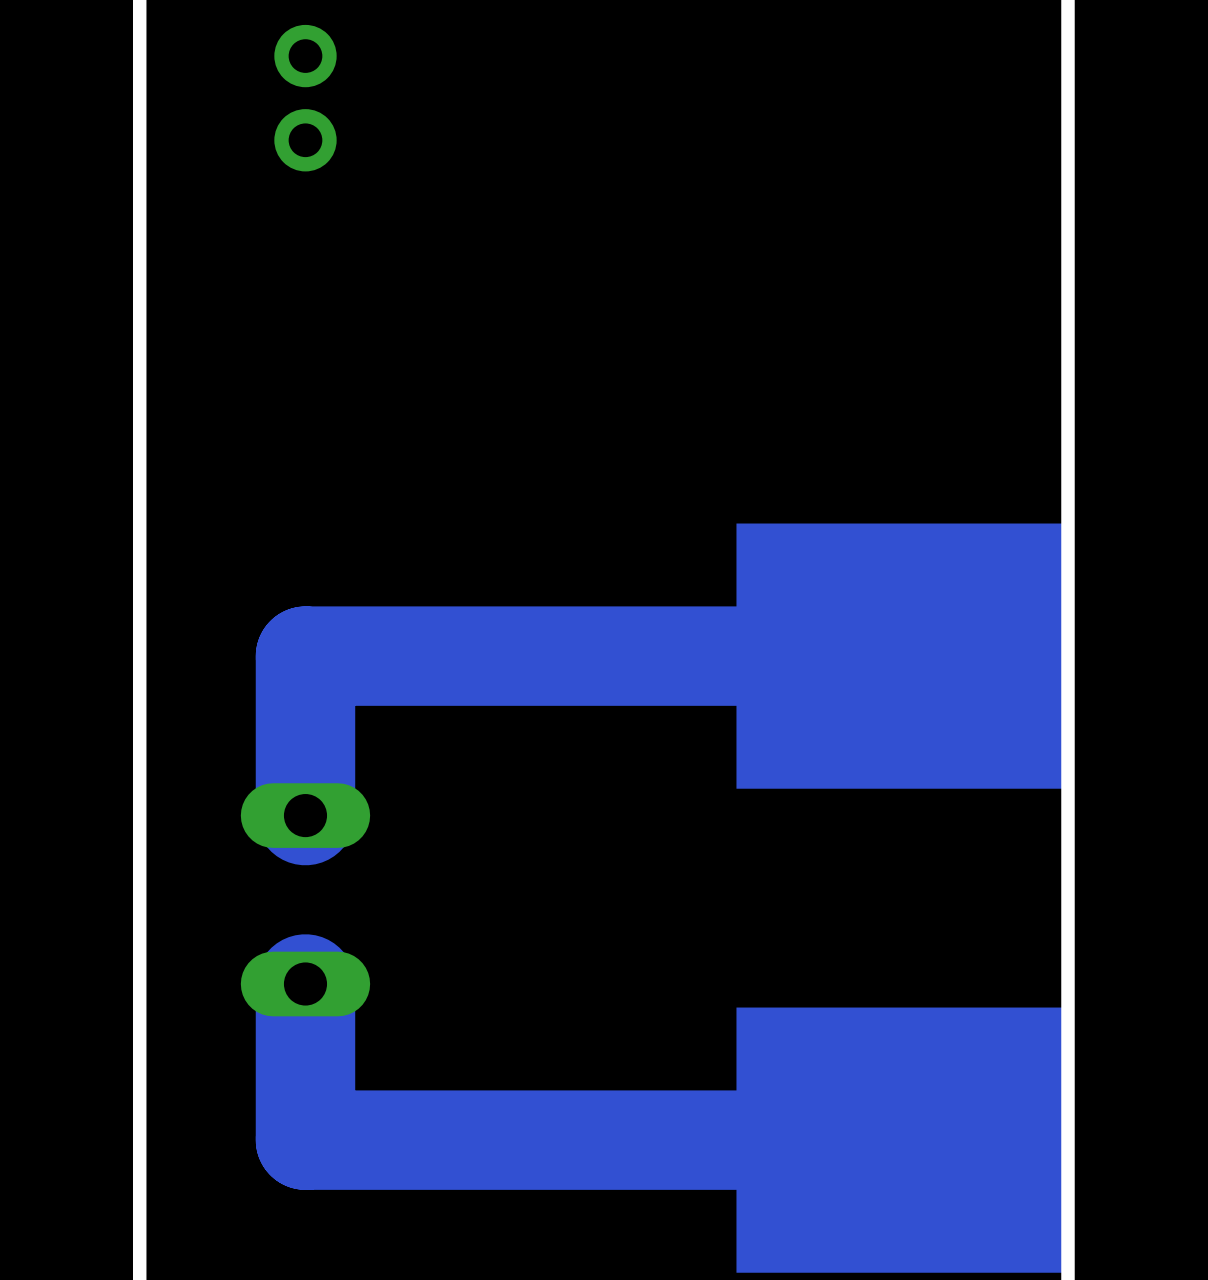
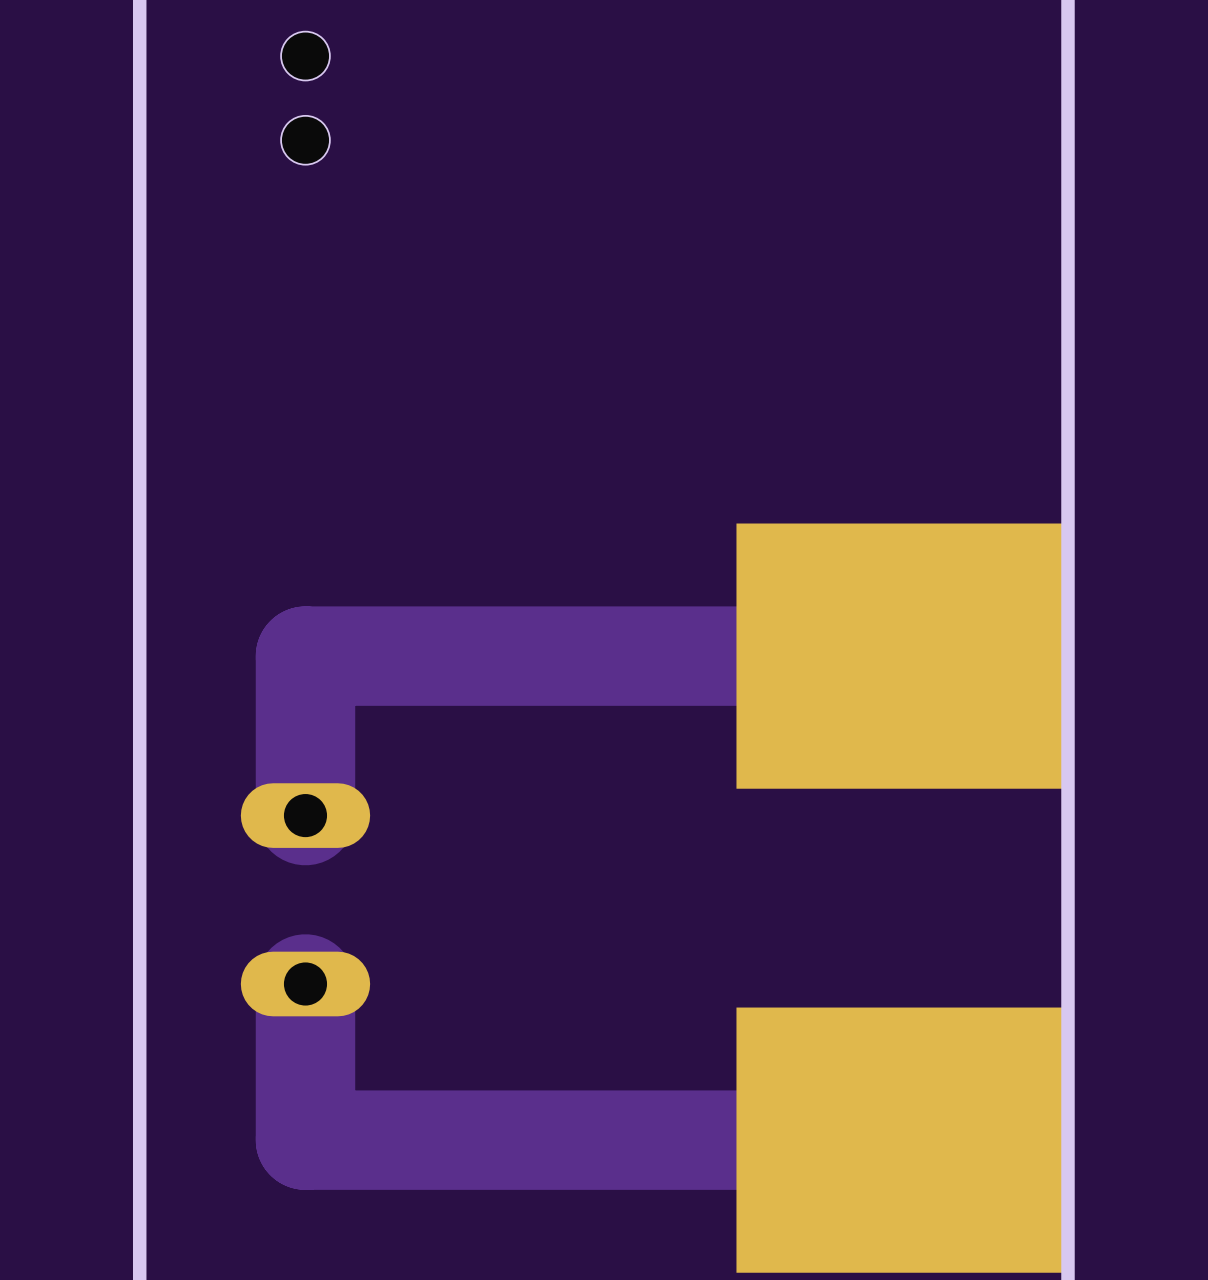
part footprint: [274, 24, 337, 172] -> [281, 31, 330, 165]

